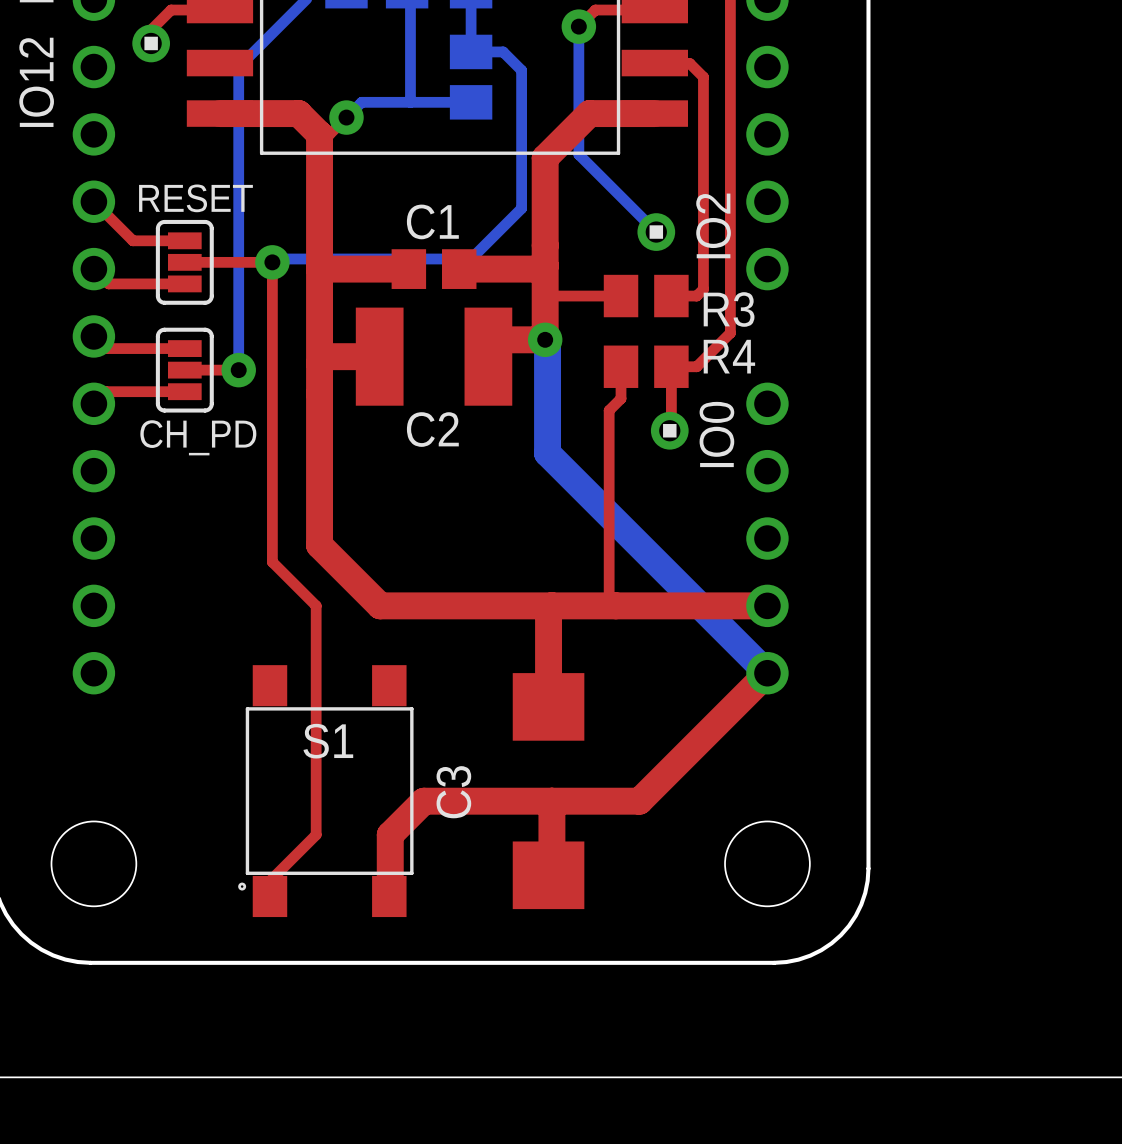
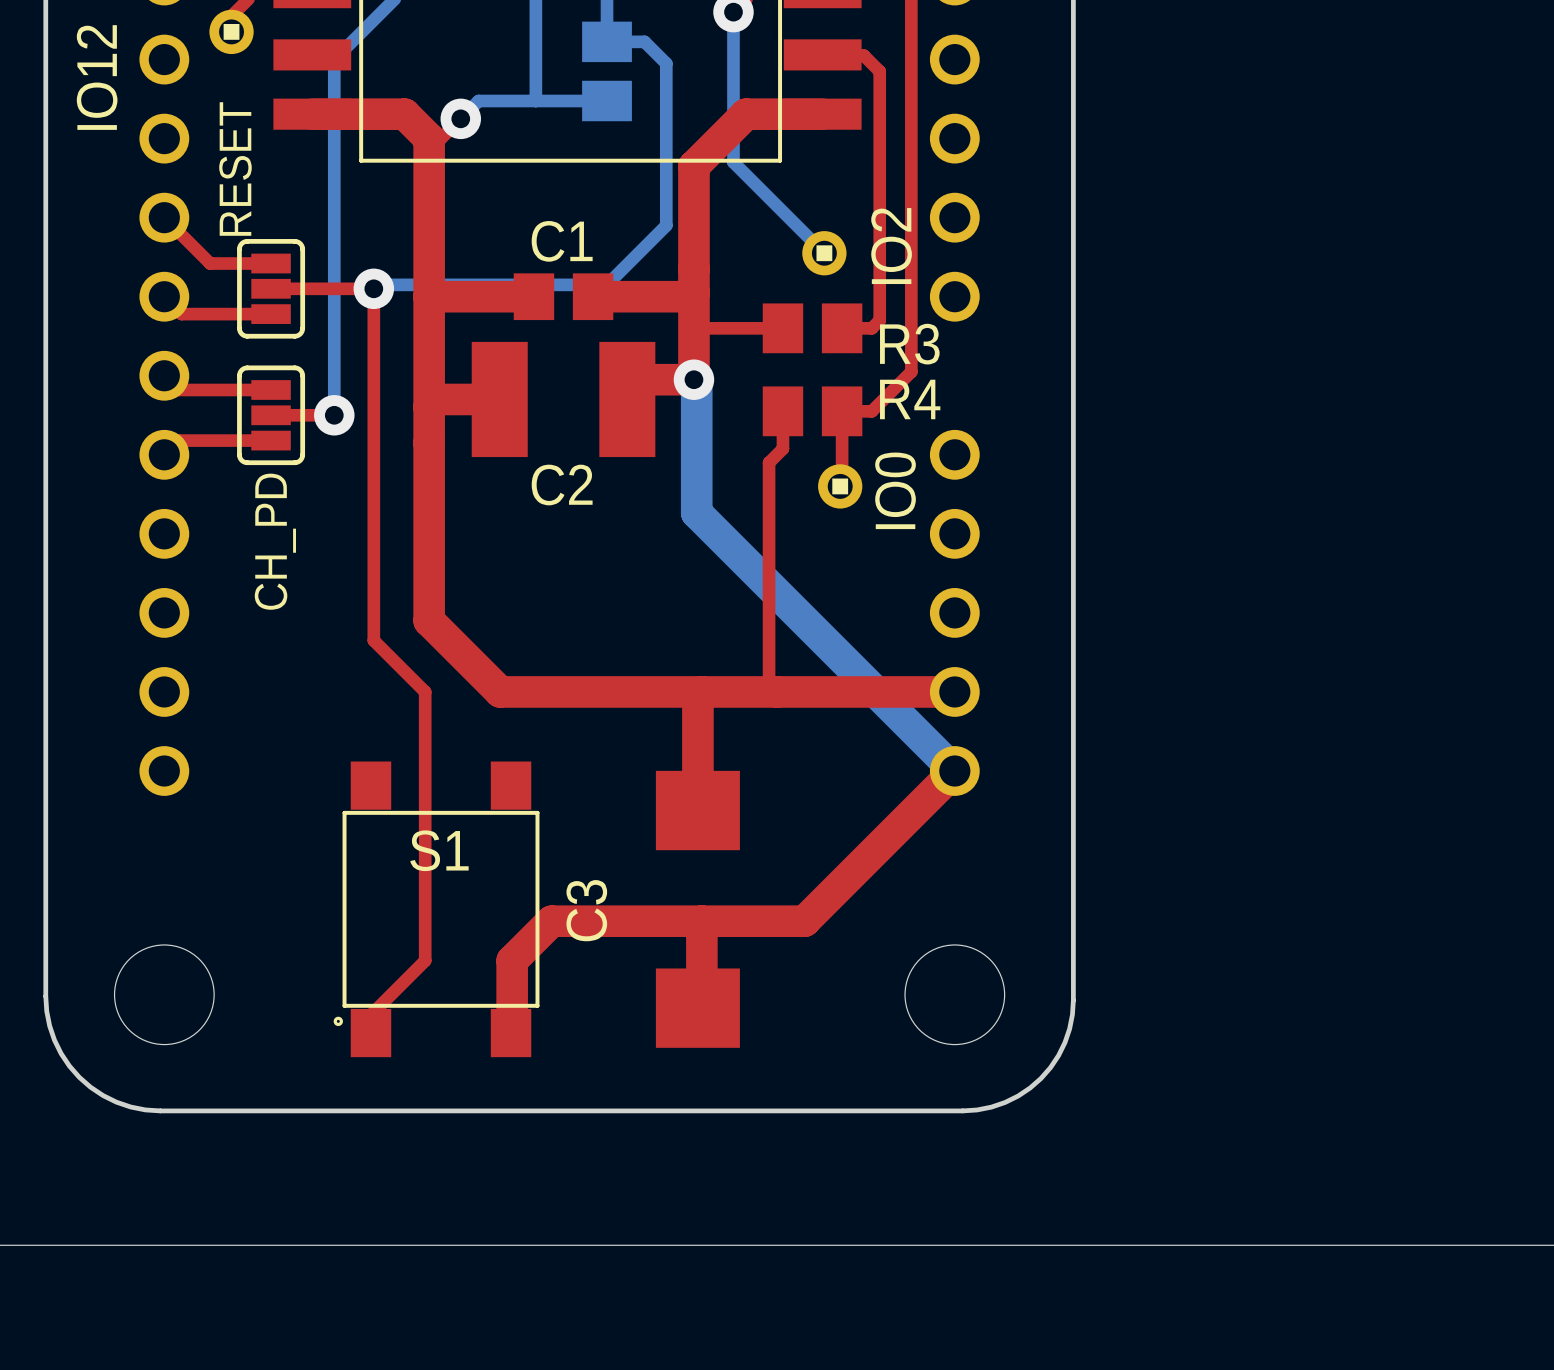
RESET name rotation: 0° (195, 198) -> 90° counterclockwise (235, 169)
CH_PD name rotation: 0° (198, 437) -> 90° counterclockwise (275, 541)

